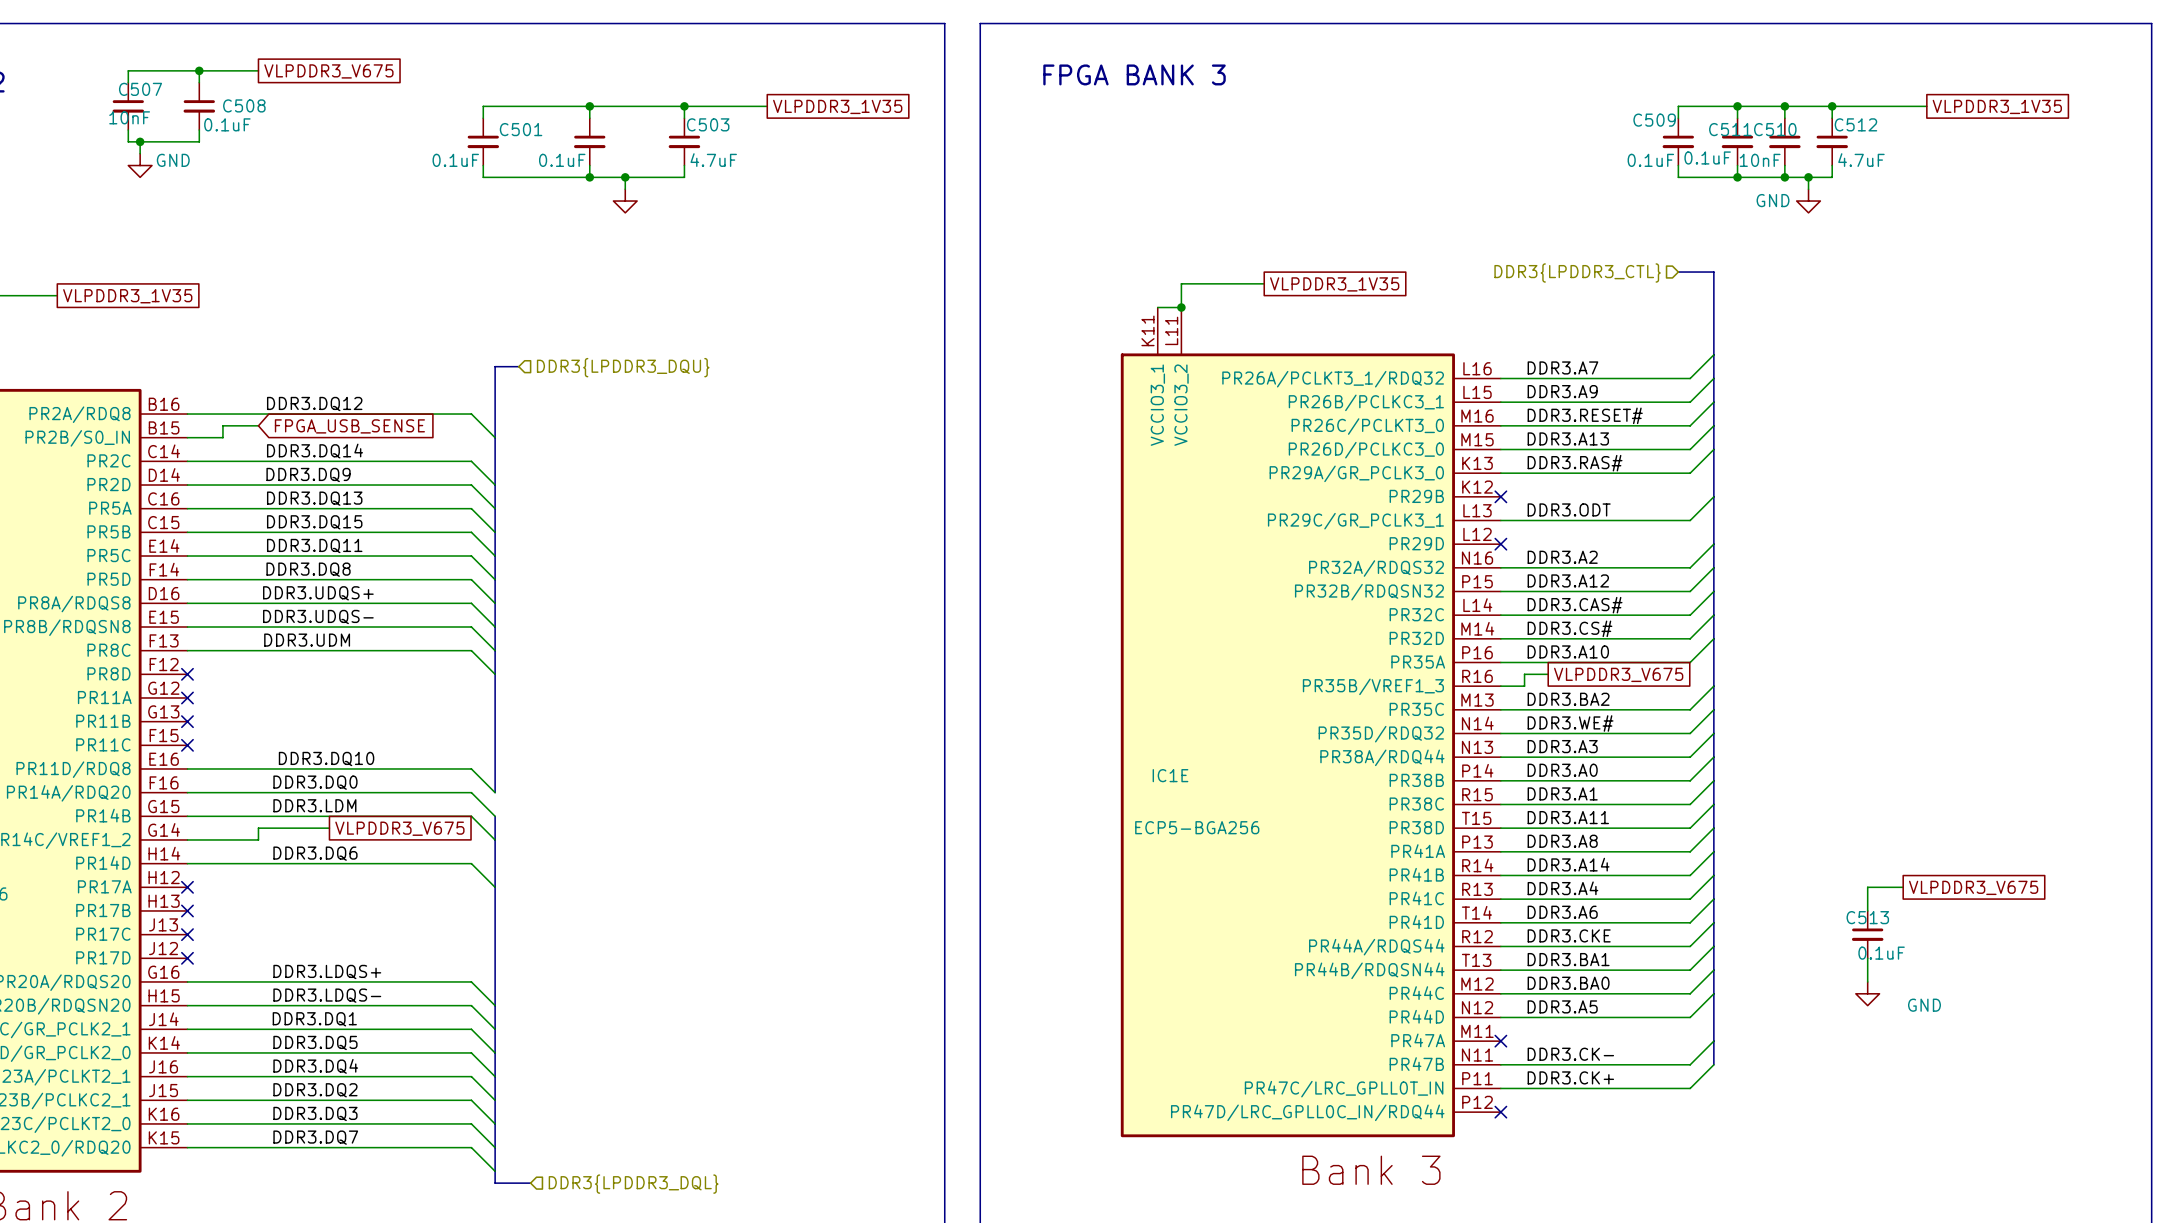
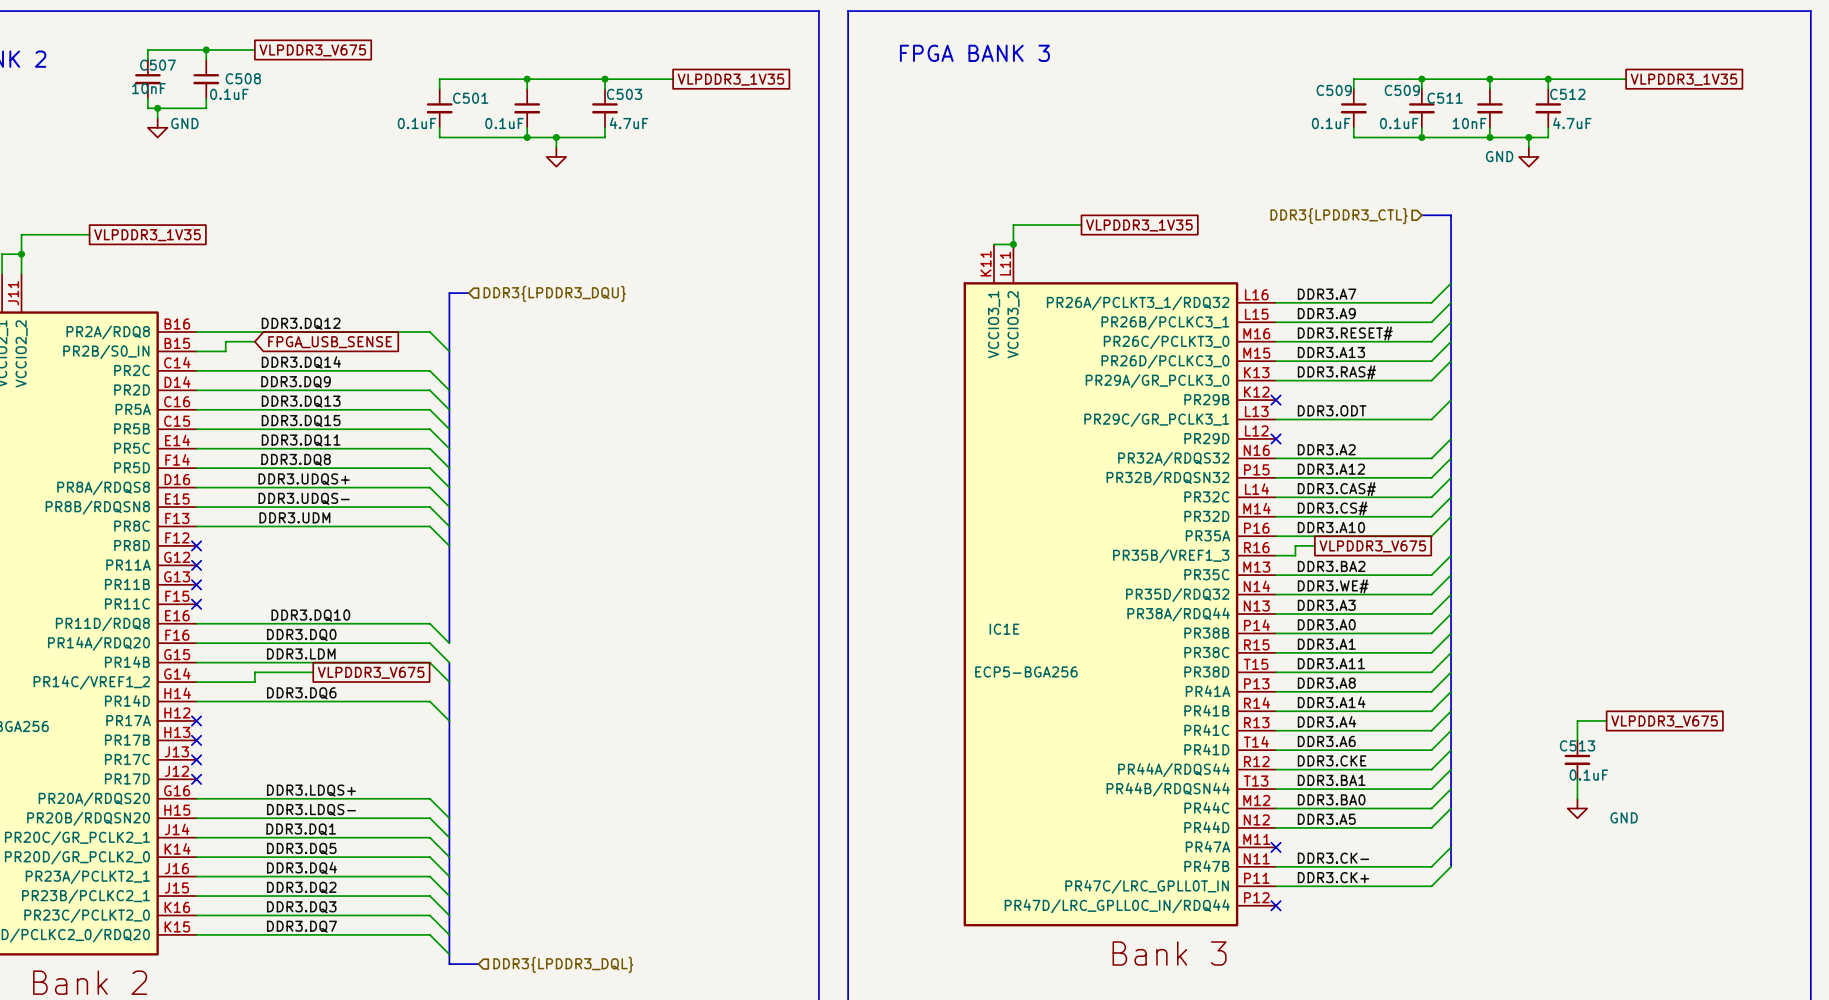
wire: none -> (1421, 79) (1353, 79) (1353, 88)
junction: none -> (1421, 79)
wire: (1737, 106) (1737, 118) -> (1489, 79) (1489, 88)
junction: (1737, 106) -> none
junction: none -> (1489, 79)
wire: (1784, 106) (1784, 118) -> none
junction: (1784, 106) -> none
C509: none -> 0.1uF (1353, 108)
C510: 0.1uF (1737, 141) -> none
C511 position: (1784, 141) -> (1489, 108)
wire: none -> (1353, 127) (1353, 137) (1421, 137)
wire: (1737, 165) (1737, 177) -> (1489, 127) (1489, 137)
wire: (1784, 165) (1784, 177) -> none
junction: none -> (1421, 137)
junction: (1737, 177) -> none
junction: none -> (1489, 137)
junction: (1784, 177) -> none

